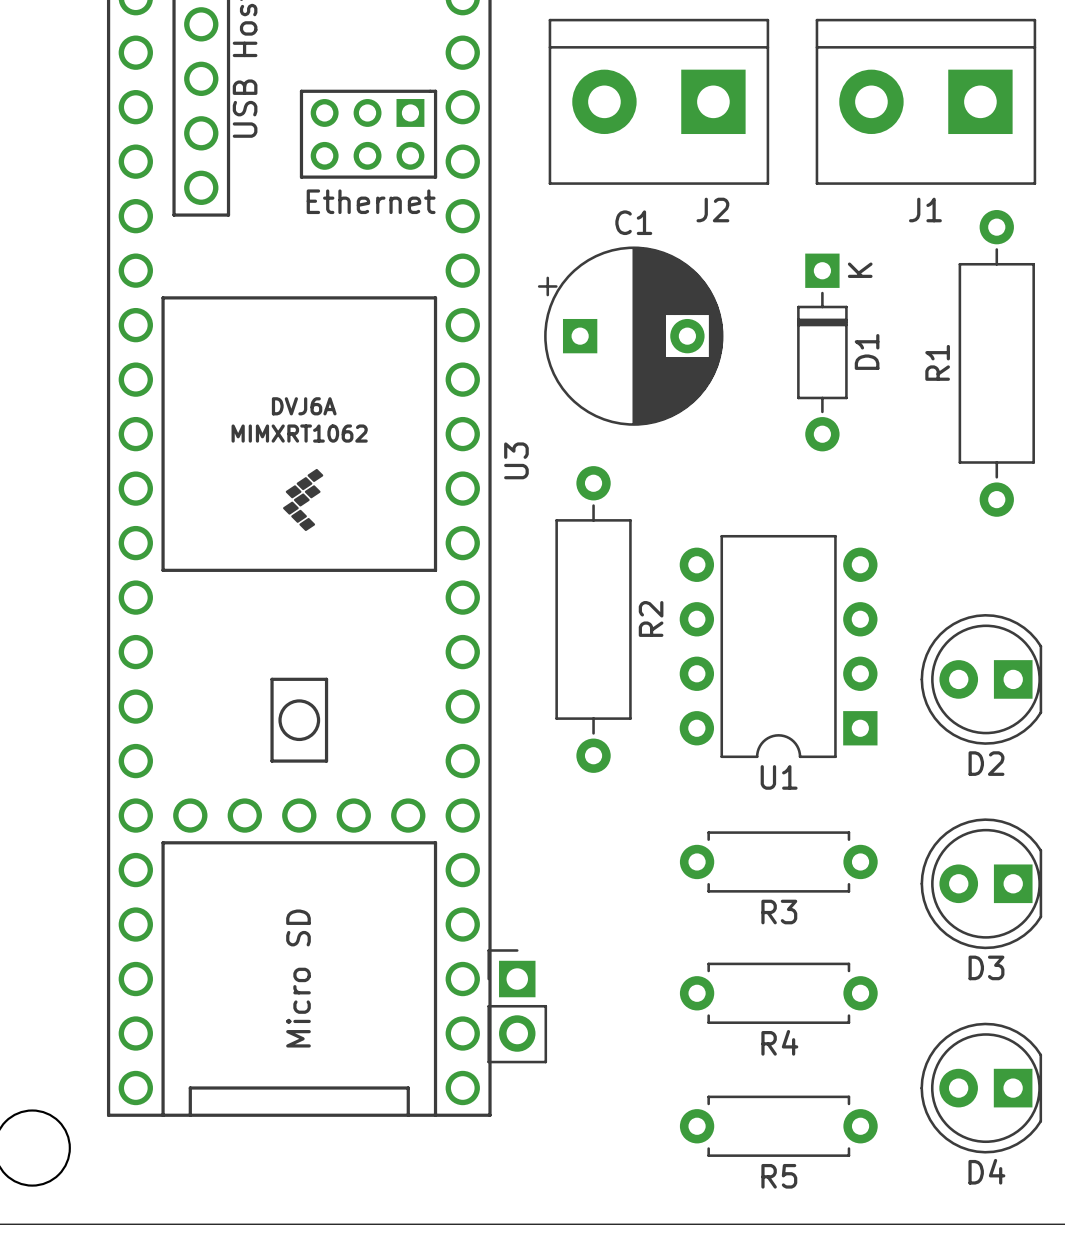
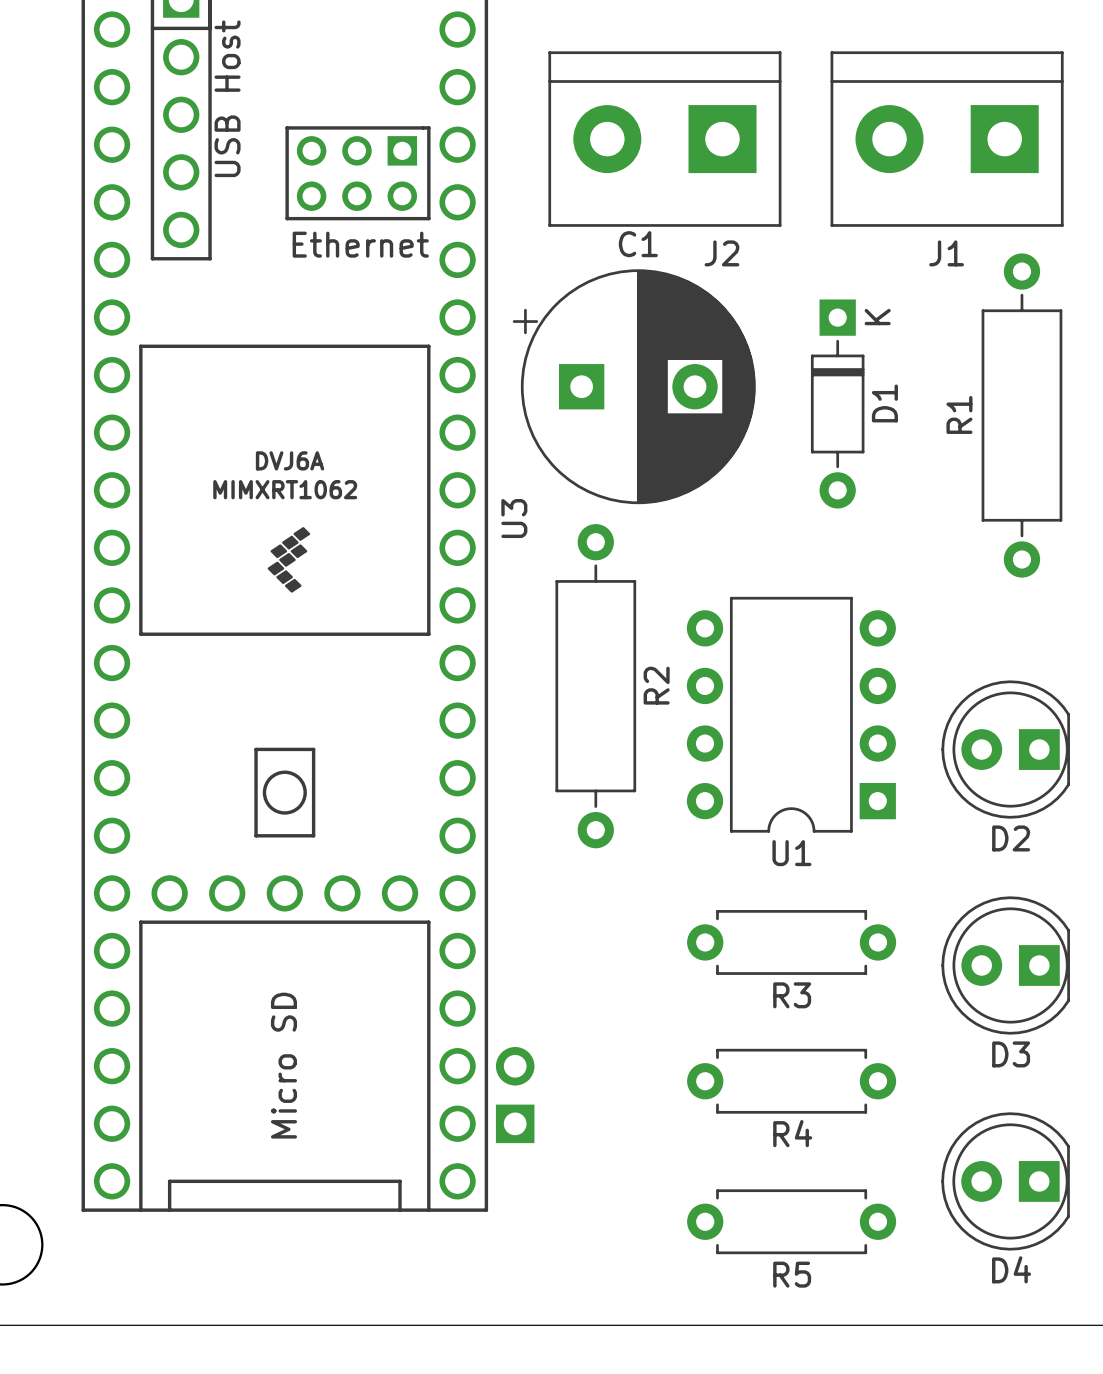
C1 footprint: [537, 246, 724, 426] -> [512, 269, 756, 505]
part footprint: [487, 949, 548, 1064] -> [495, 1047, 535, 1144]

